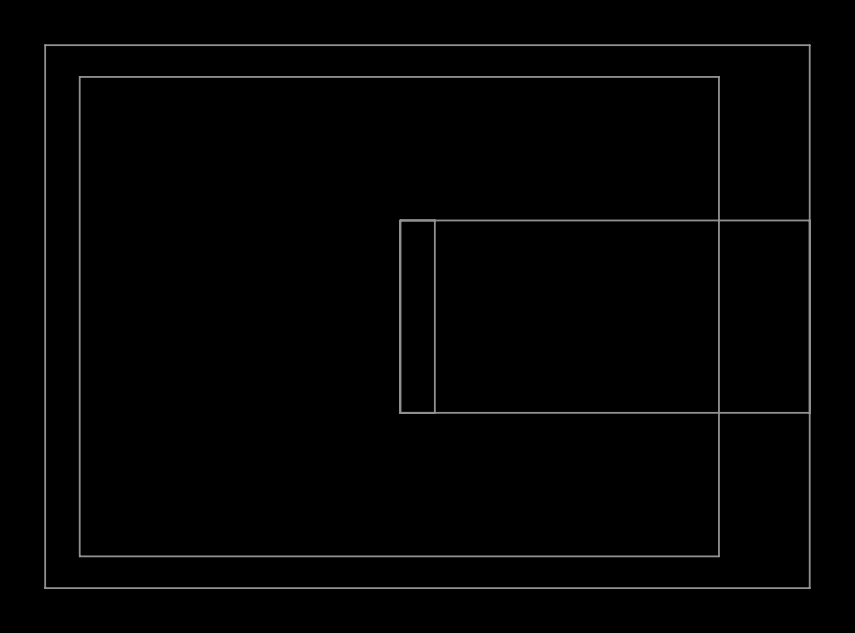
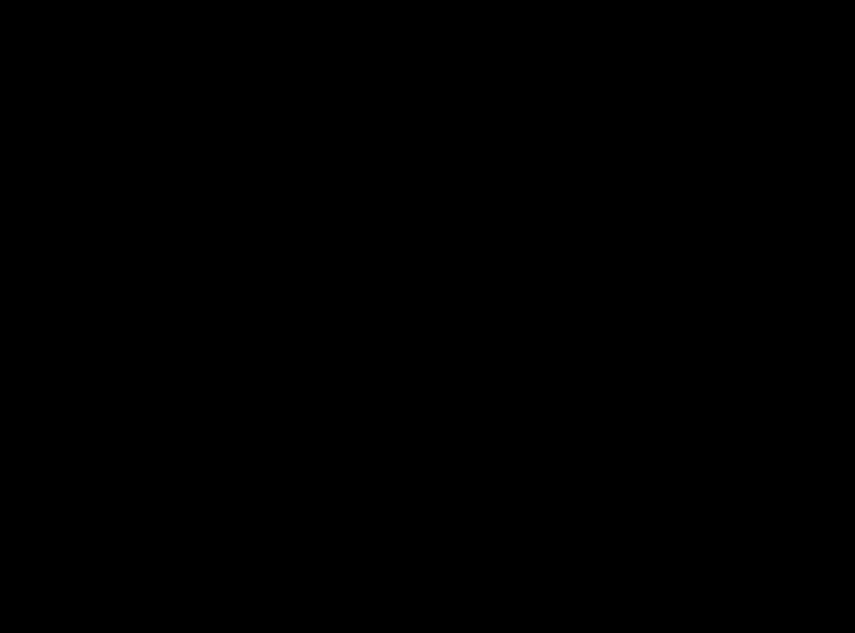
line: (45, 45) (809, 45) (809, 588) (45, 588) (45, 45) -> none
line: (79, 76) (718, 76) (718, 556) (79, 556) (79, 76) -> none
line: (434, 220) (434, 412) -> none
line: (809, 220) (400, 220) (400, 412) (809, 412) -> none

